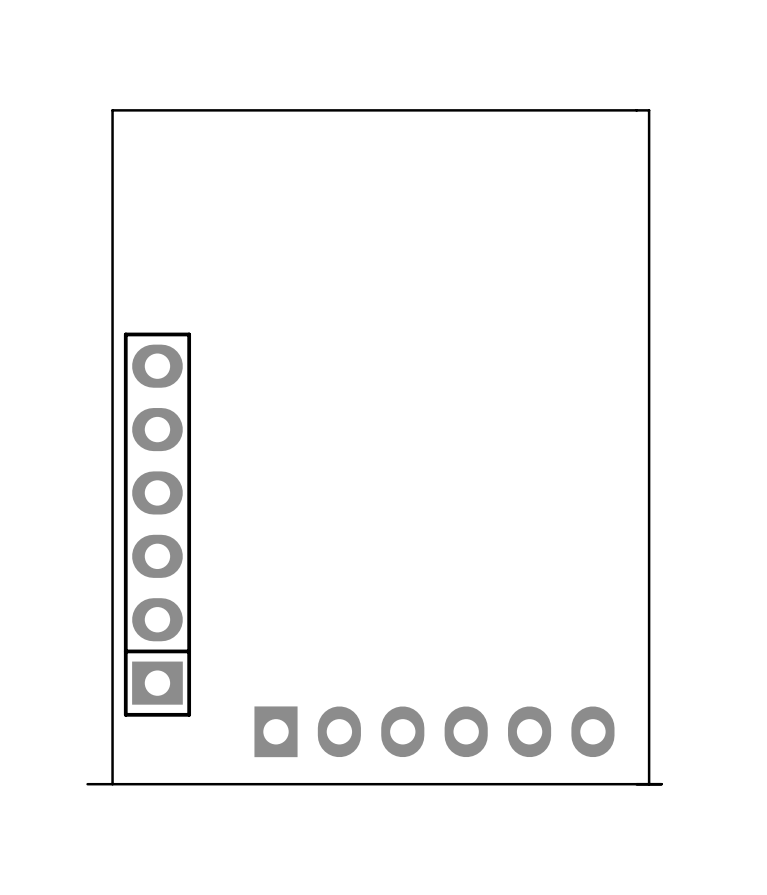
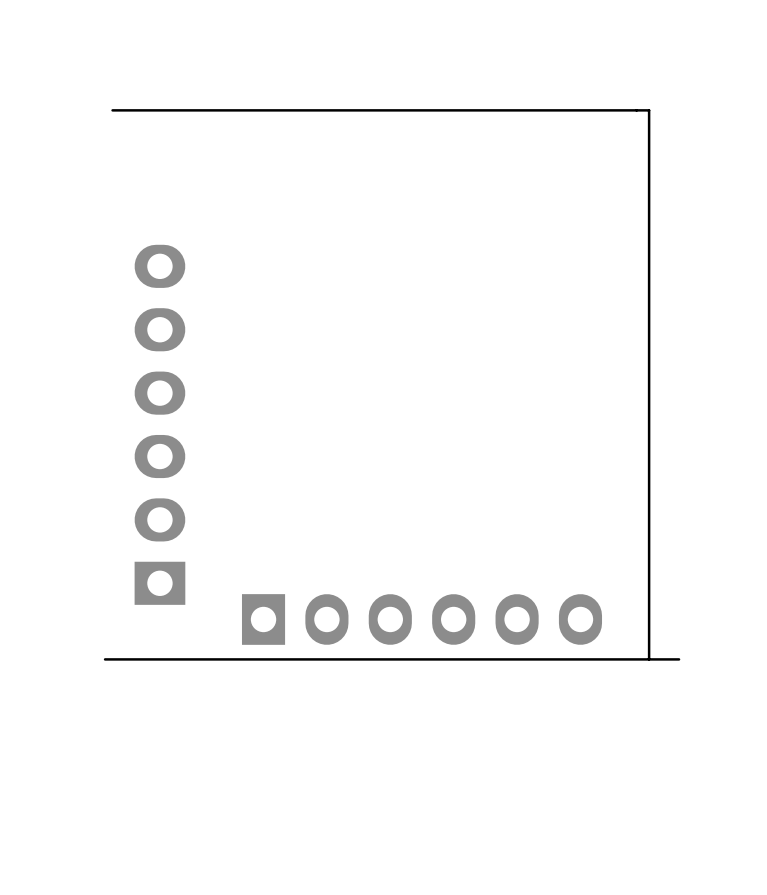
board edge: (112, 110) (112, 784) -> none
part side: bottom (157, 524) -> top (159, 424)
board edge: (649, 659) (649, 784) -> none
part position: (434, 731) -> (422, 619)
board edge: (661, 784) (87, 784) -> (679, 659) (105, 659)

